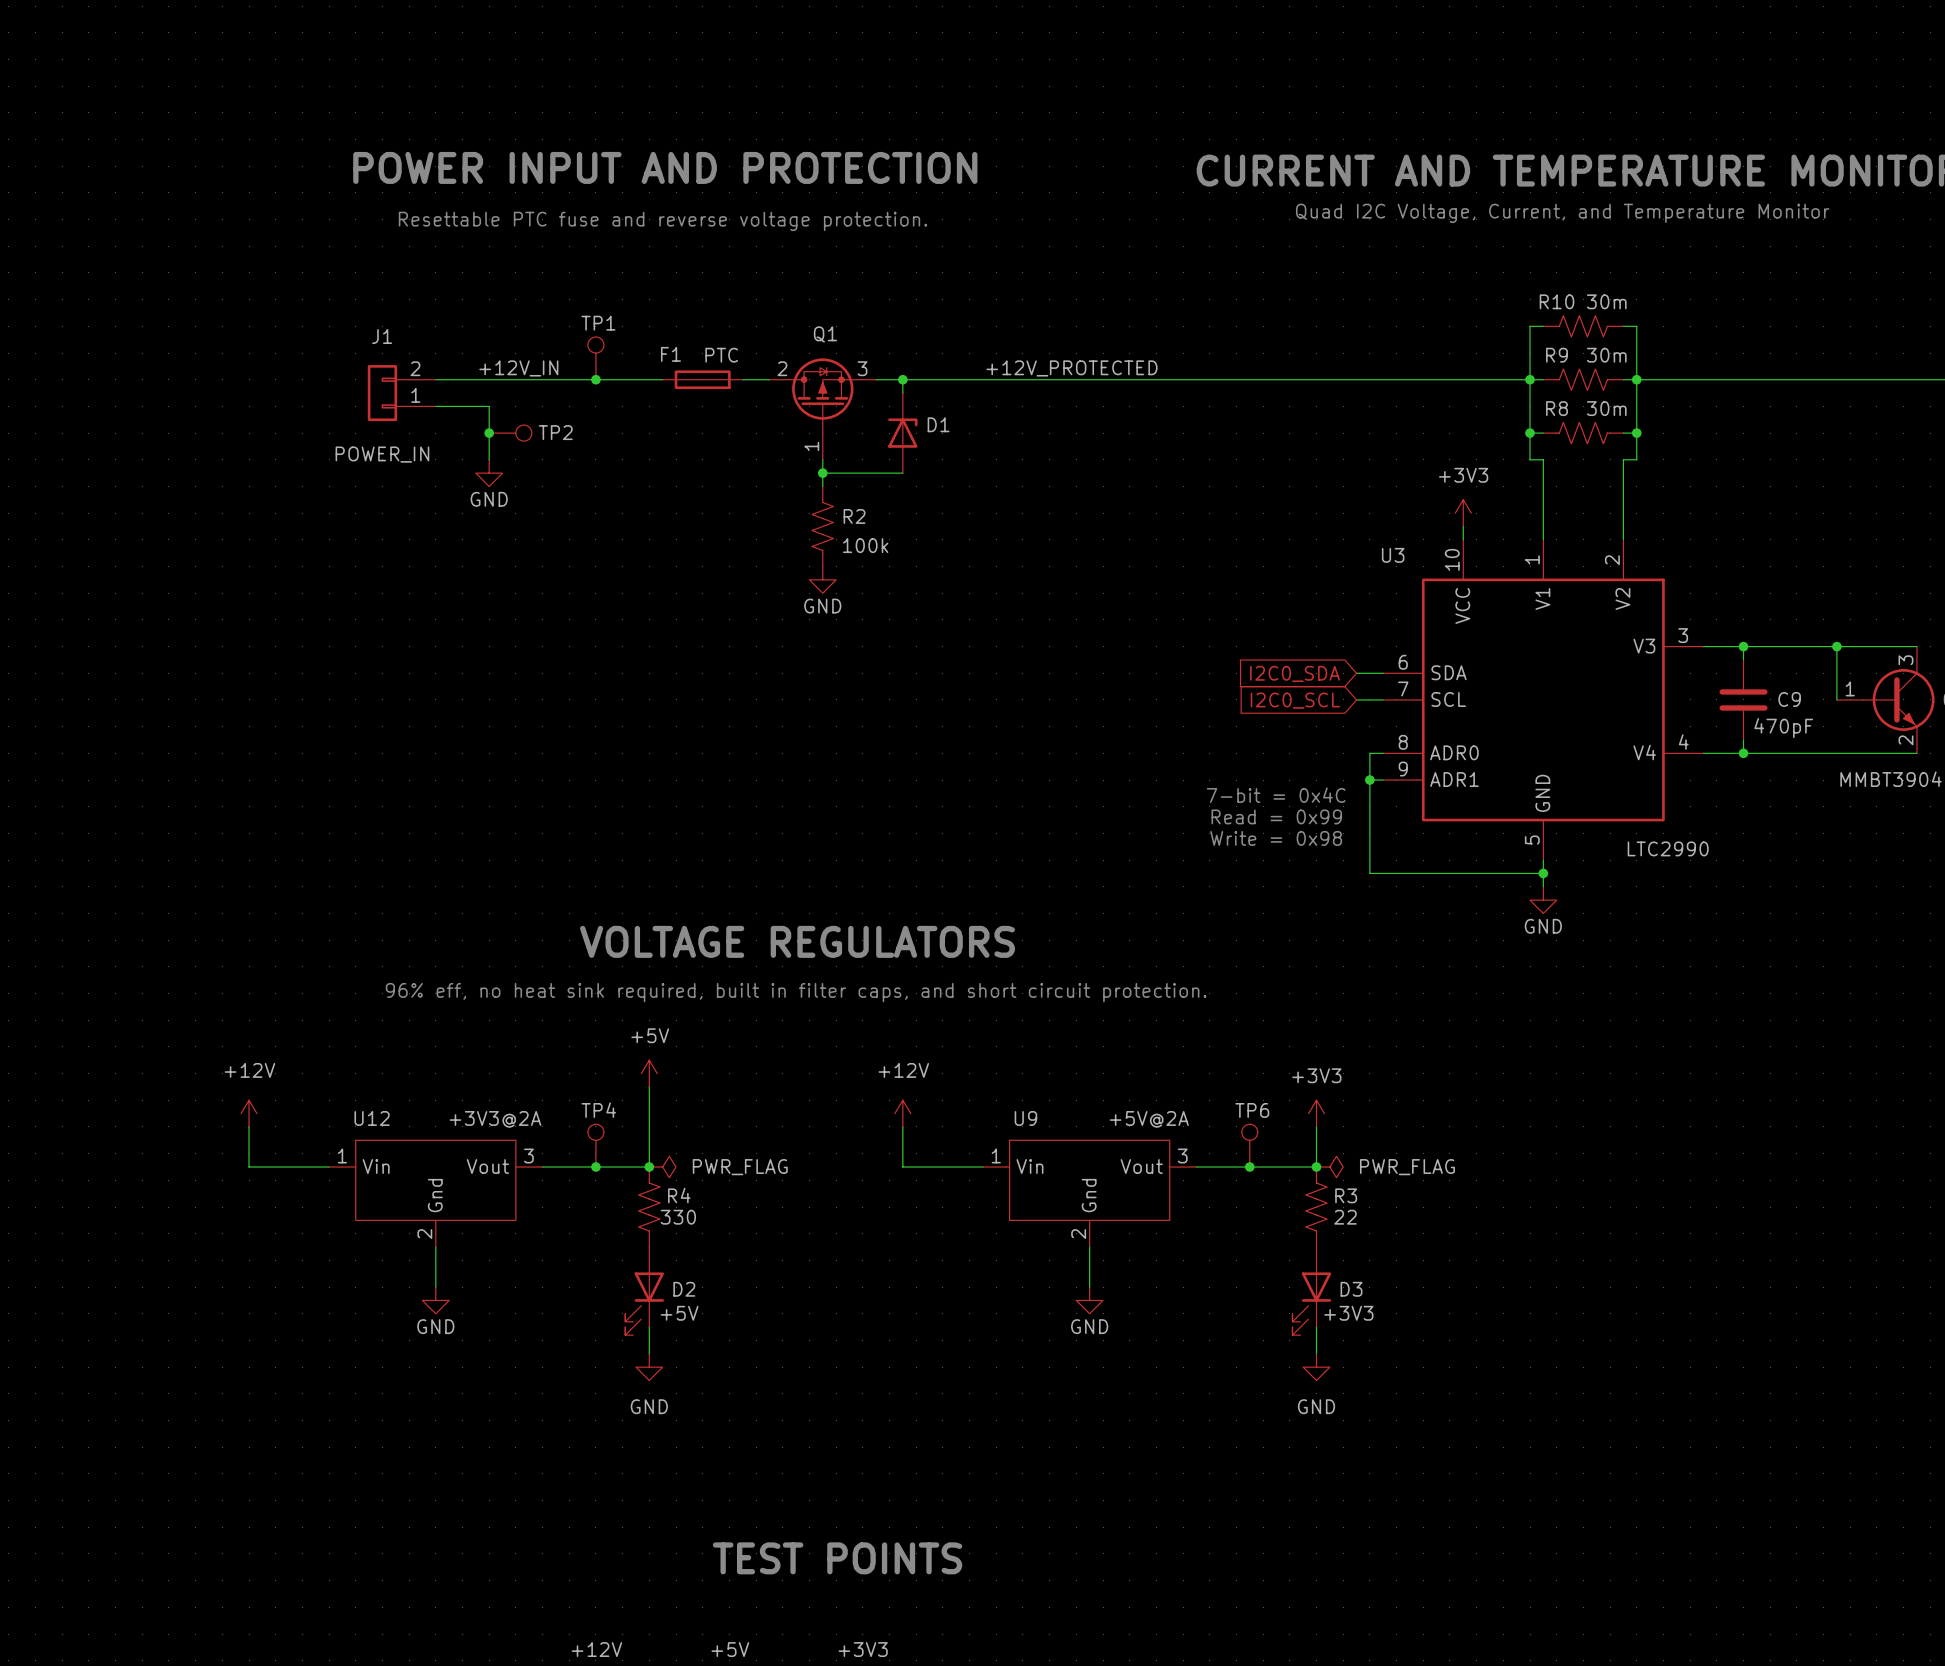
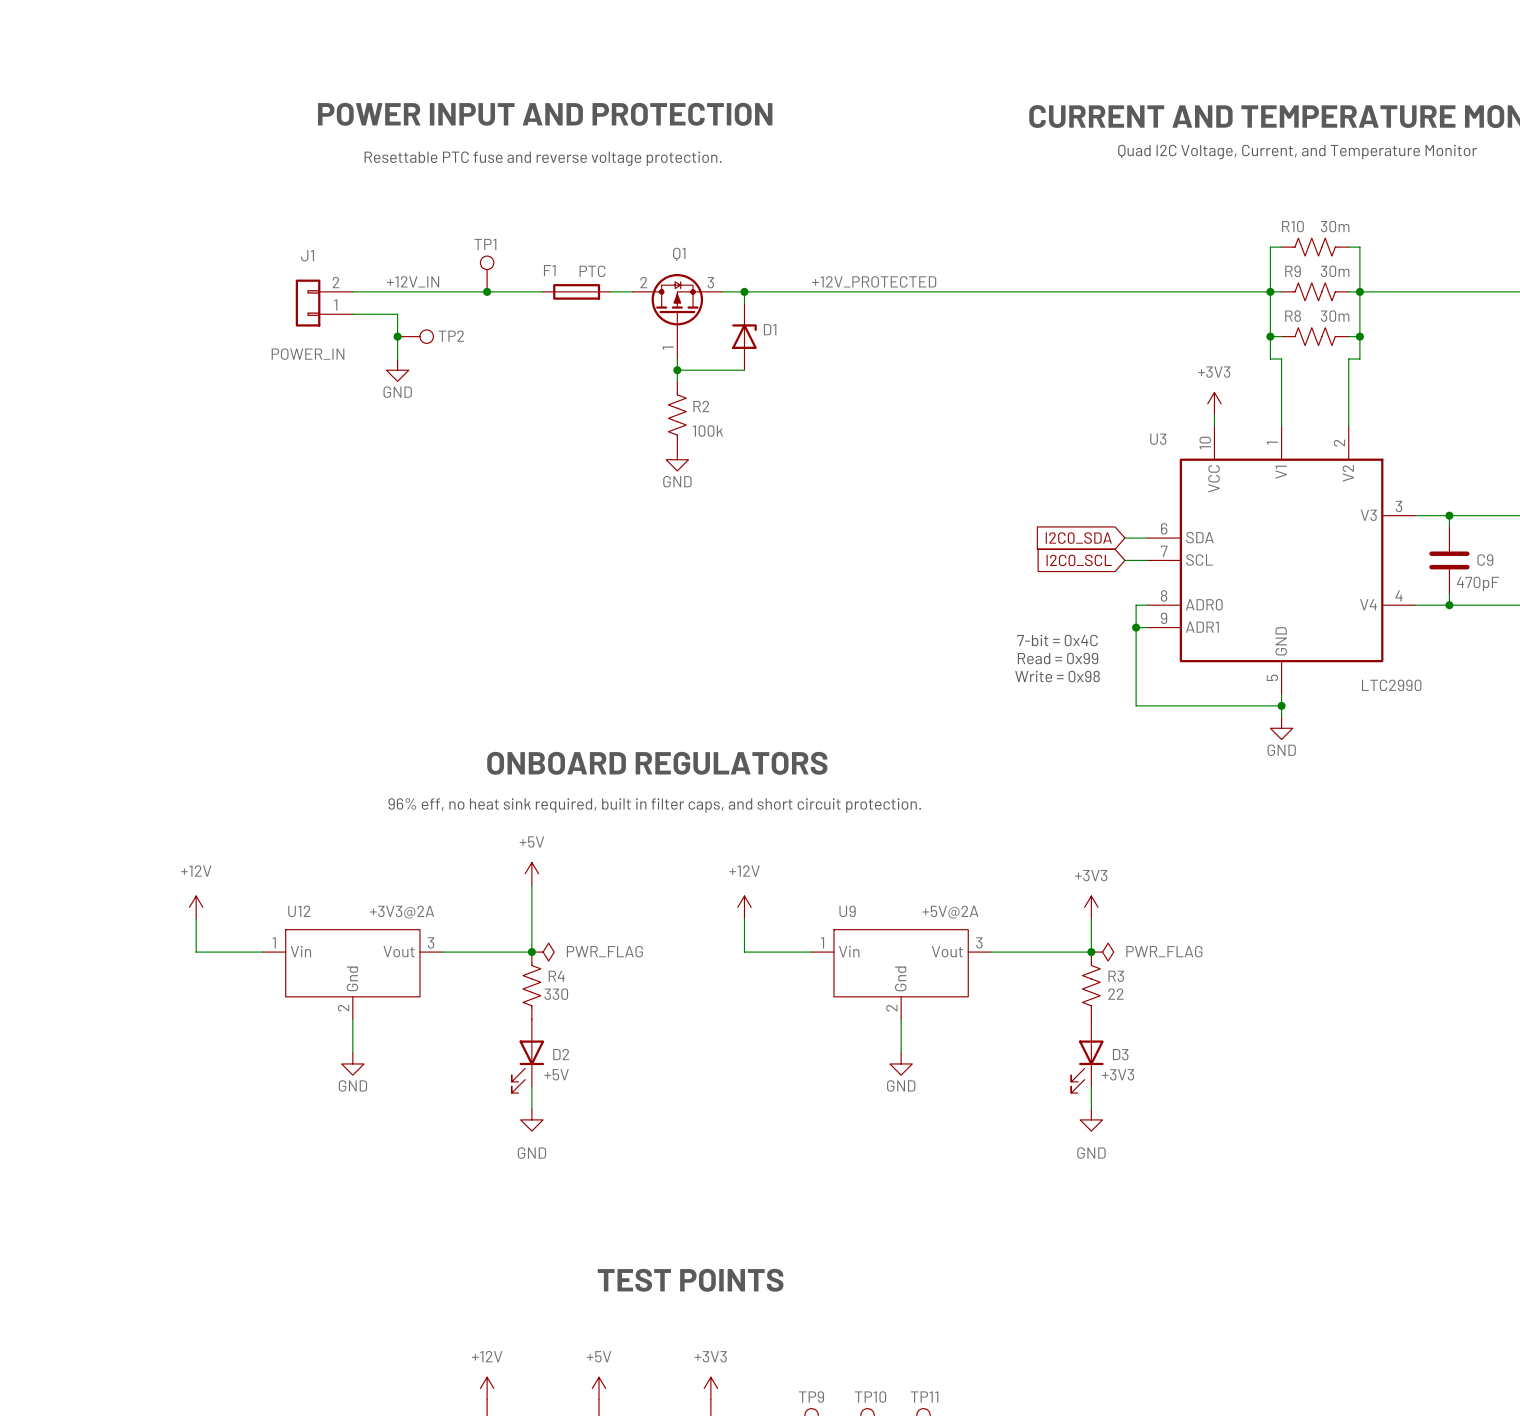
text: VOLTAGE REGULATORS (797, 941) -> ONBOARD REGULATORS (657, 763)
TP4: (595, 1145) -> none
TP6: (1249, 1145) -> none
junction: (595, 1167) -> none
junction: (1249, 1167) -> none

